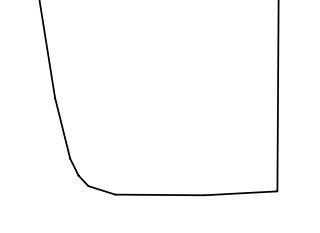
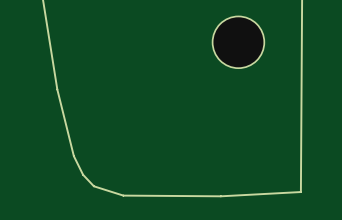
part: none -> (238, 42)

